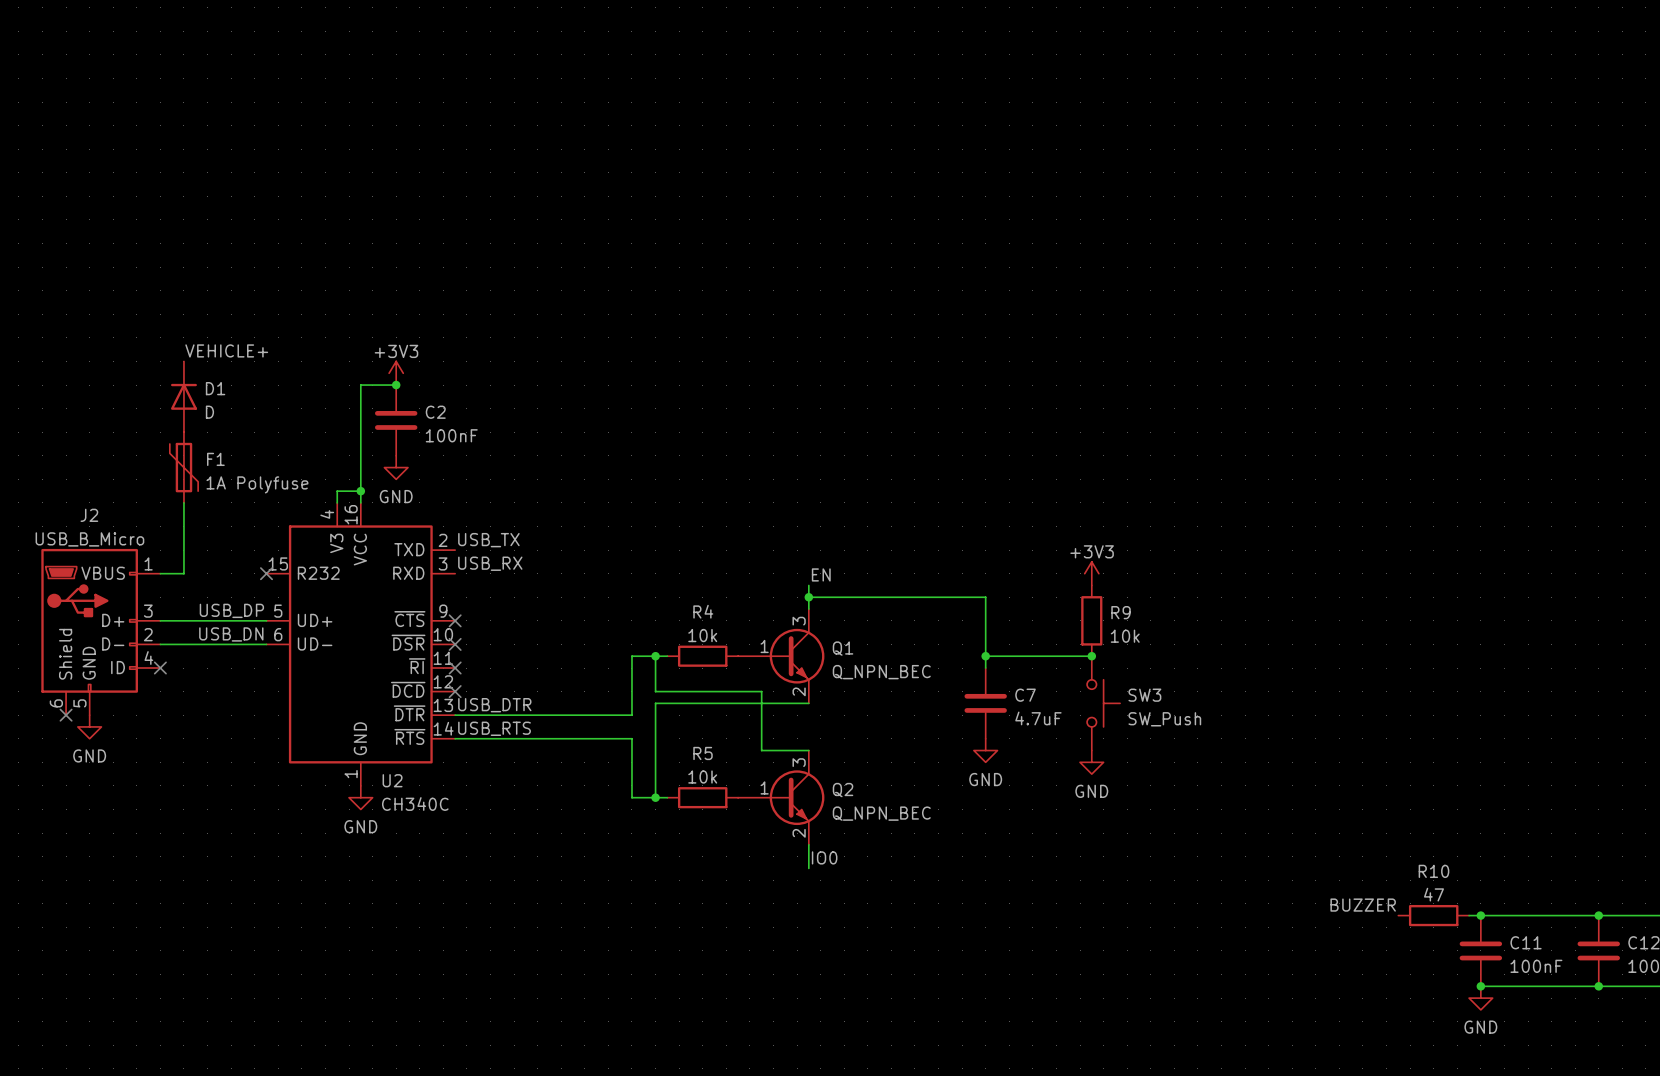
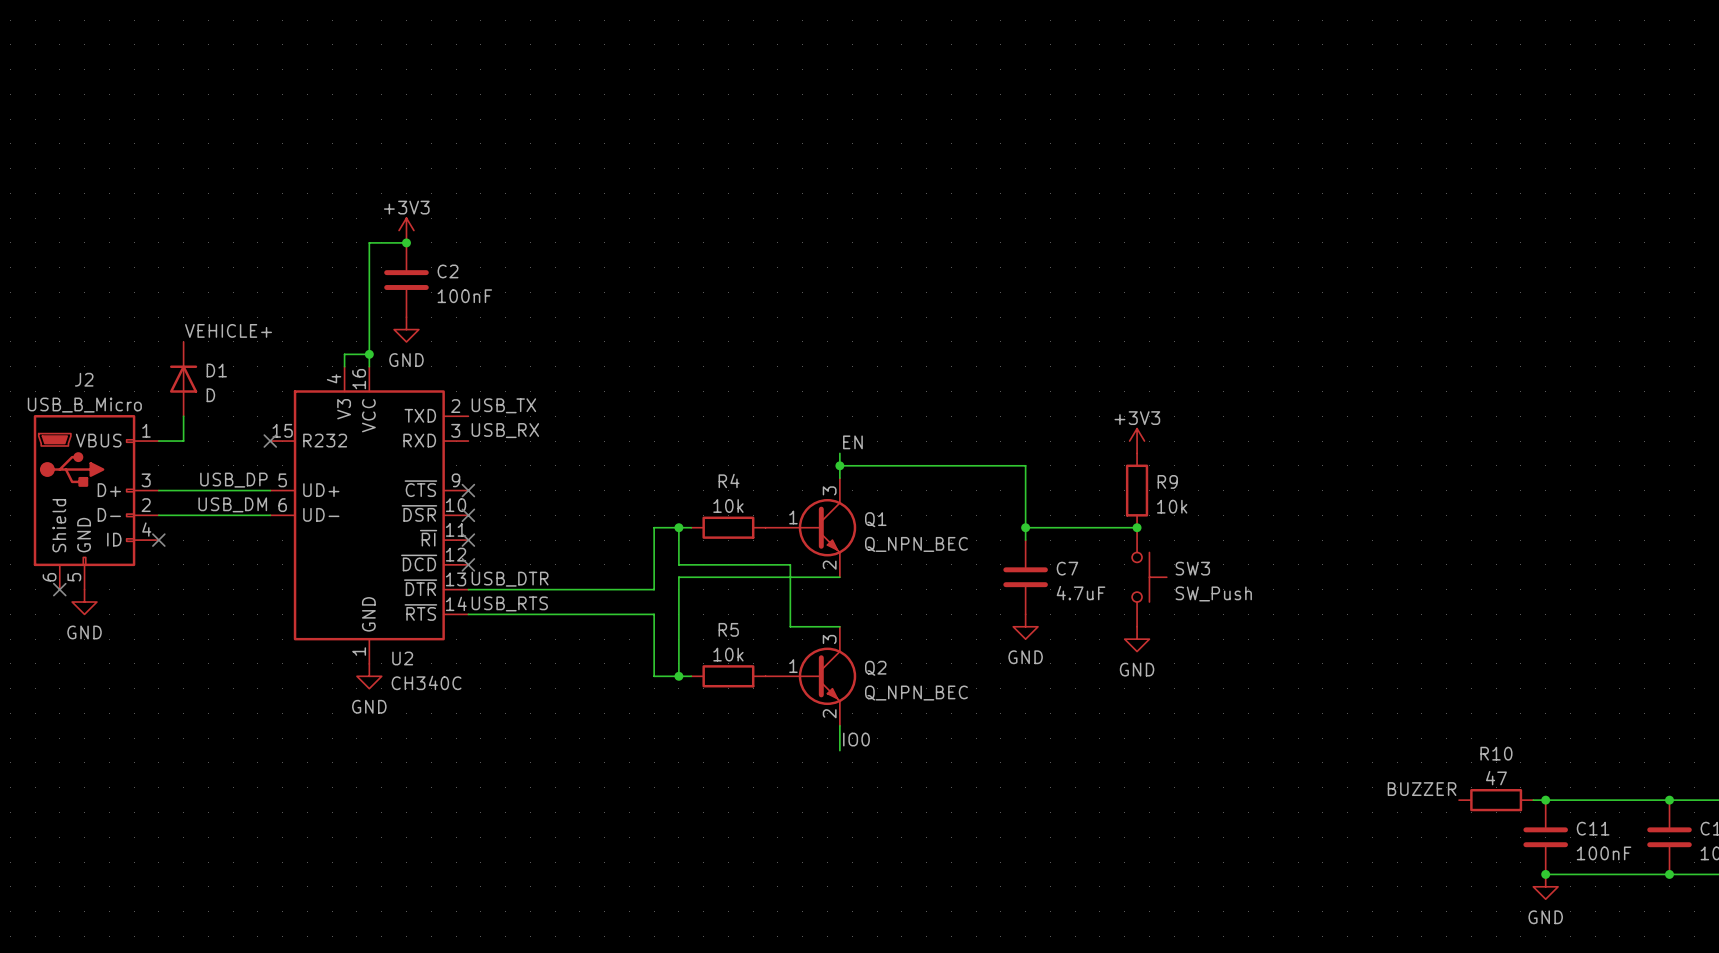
label position: VEHICLE+ (226, 350) -> VEHICLE+ (228, 330)
D1 position: (183, 396) -> (183, 379)
F1: 1A Polyfuse (183, 467) -> none
label: USB_DN (231, 634) -> USB_DM (232, 504)

